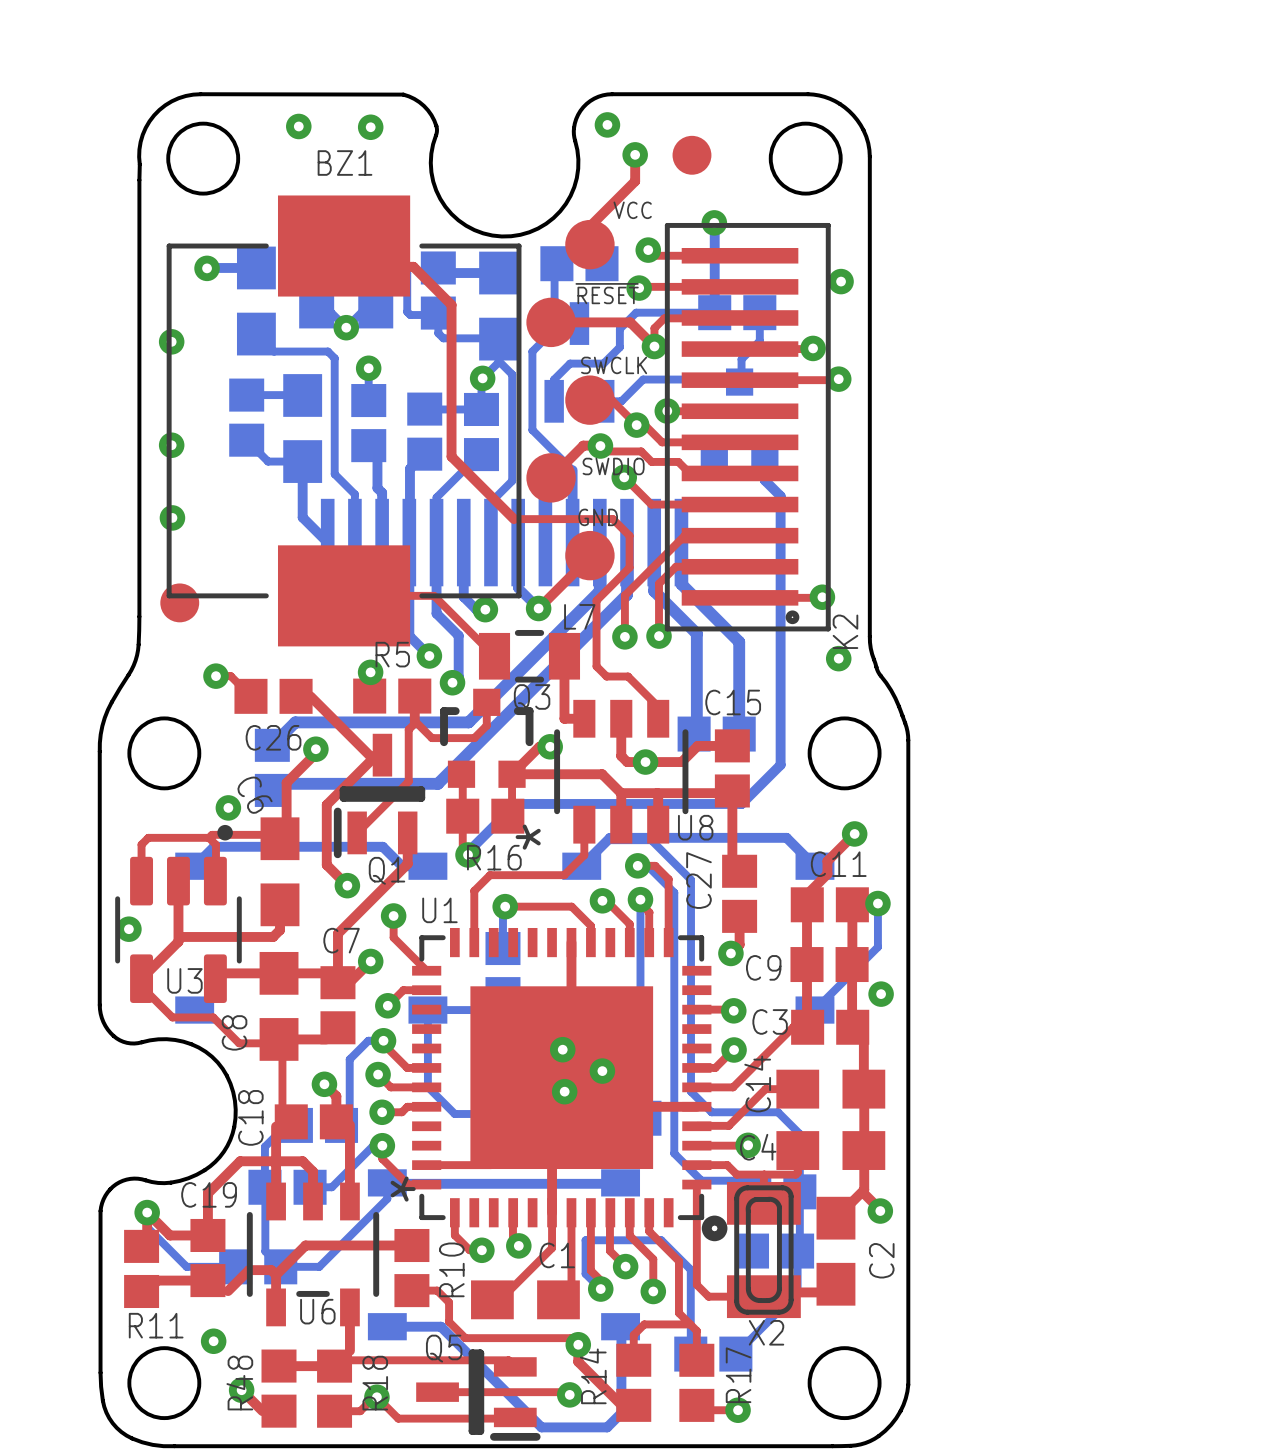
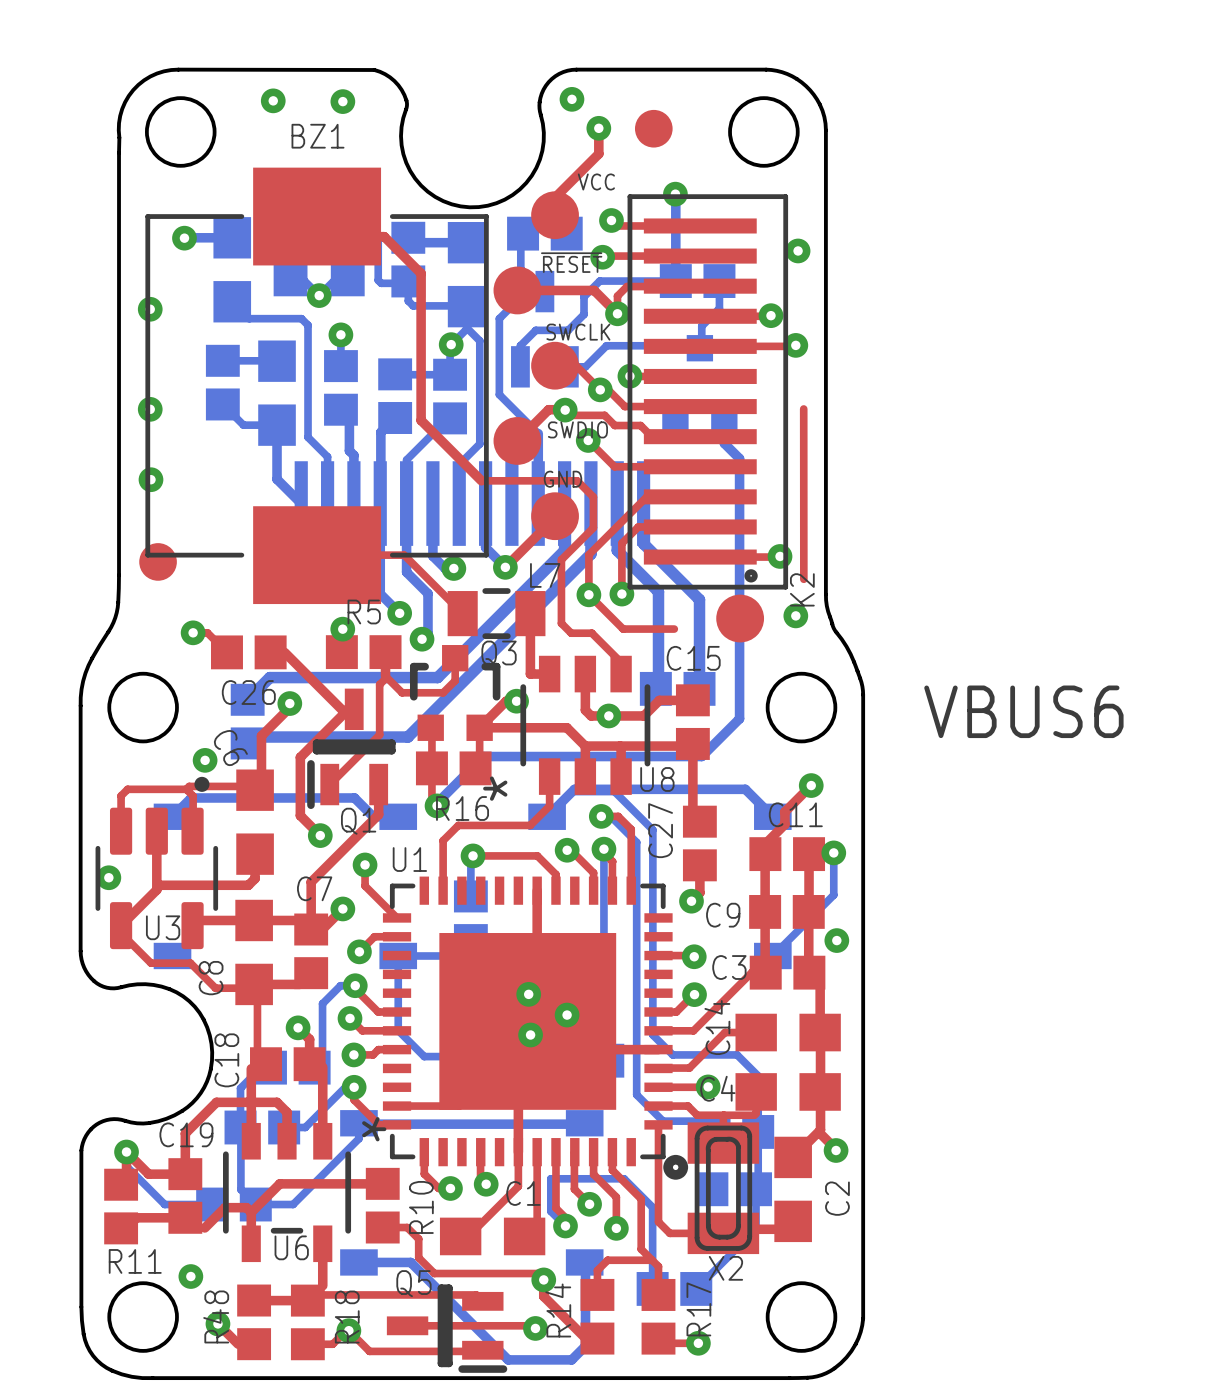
top track: none -> (803, 408) (803, 579)
top track: none -> (588, 594) (623, 629) (674, 629)
VBUS6: none -> (740, 618)

